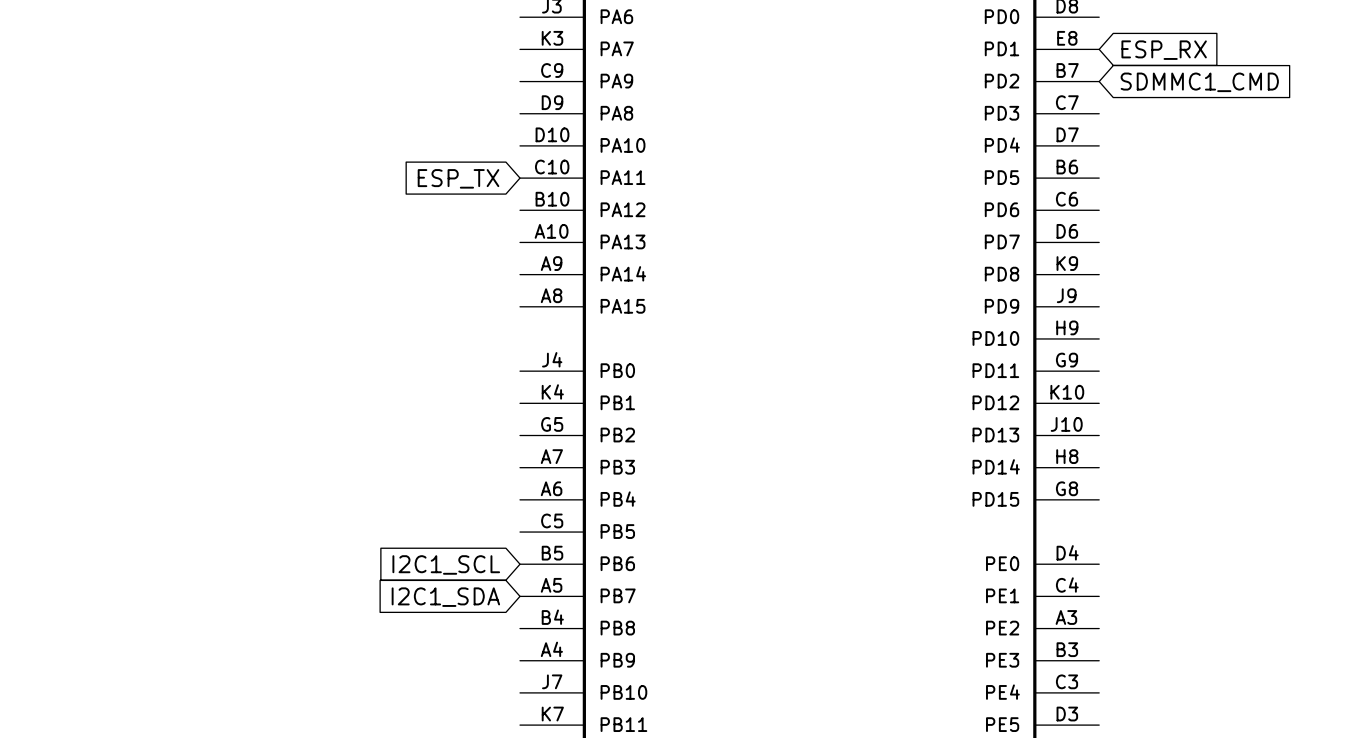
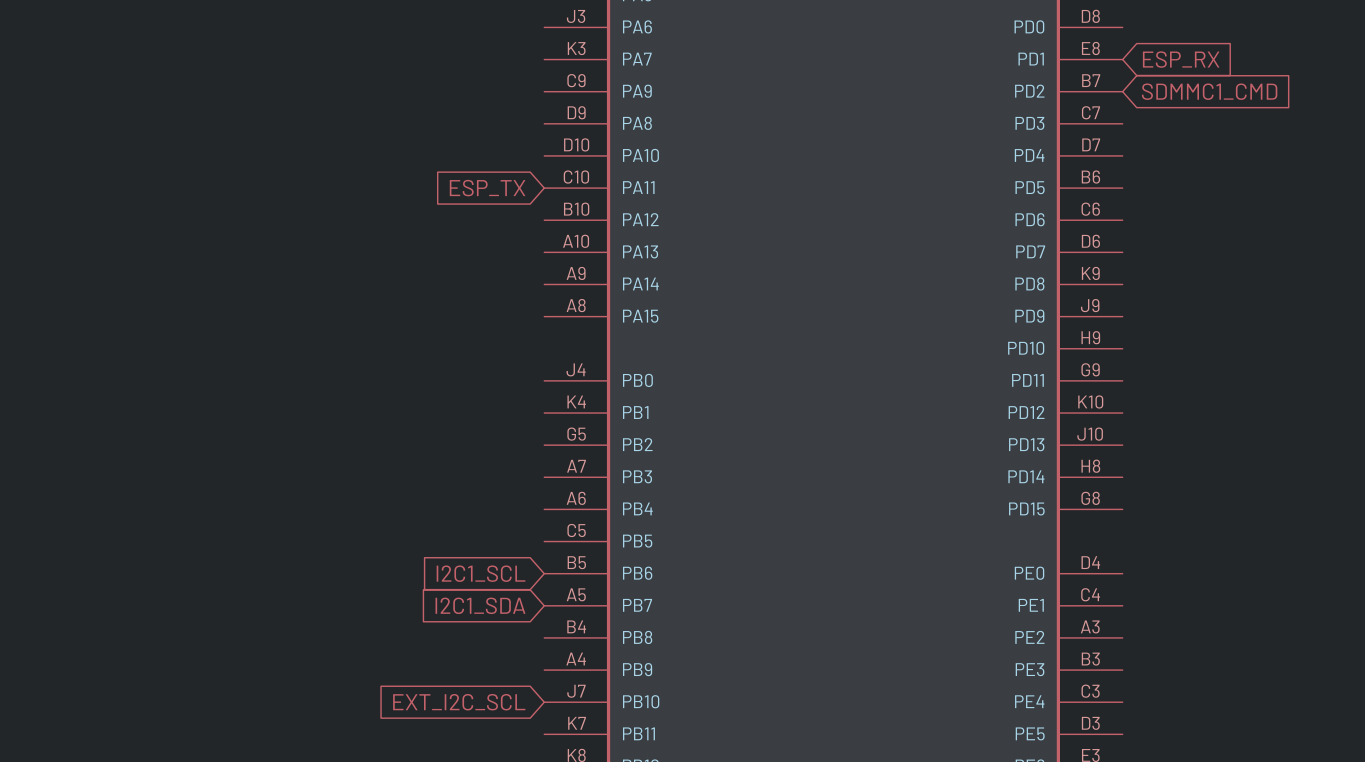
global label: none -> EXT_I2C_SCL (459, 702)

